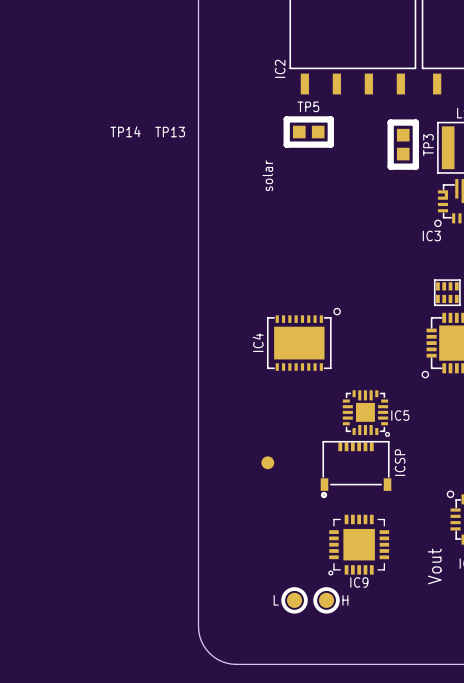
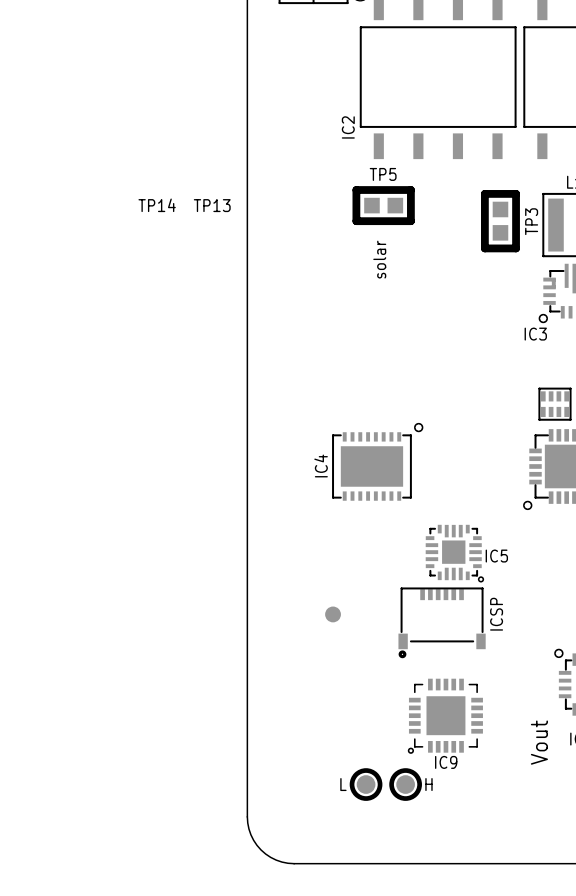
text position: solar (267, 175) -> solar (379, 259)

